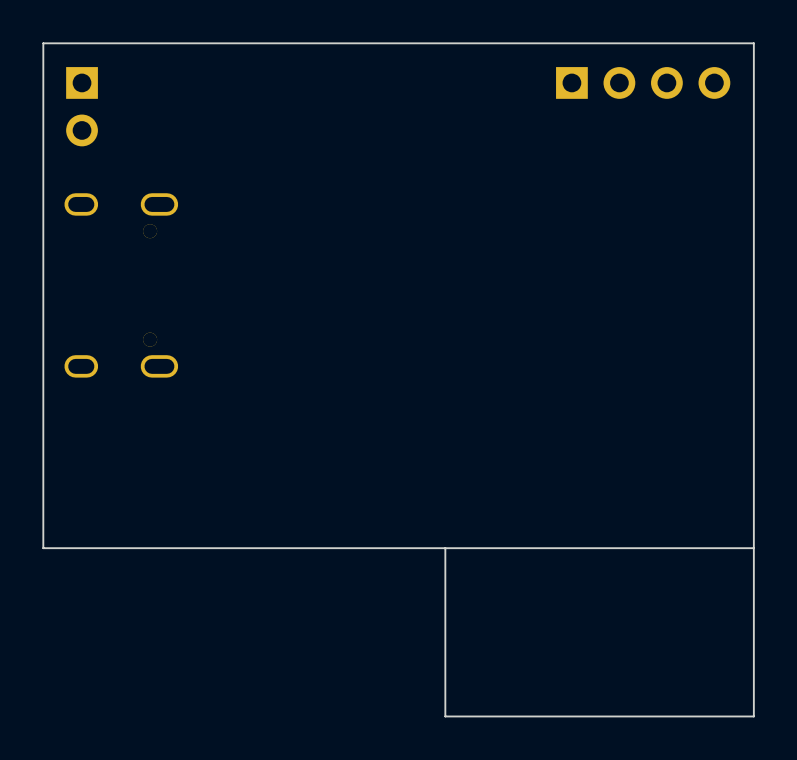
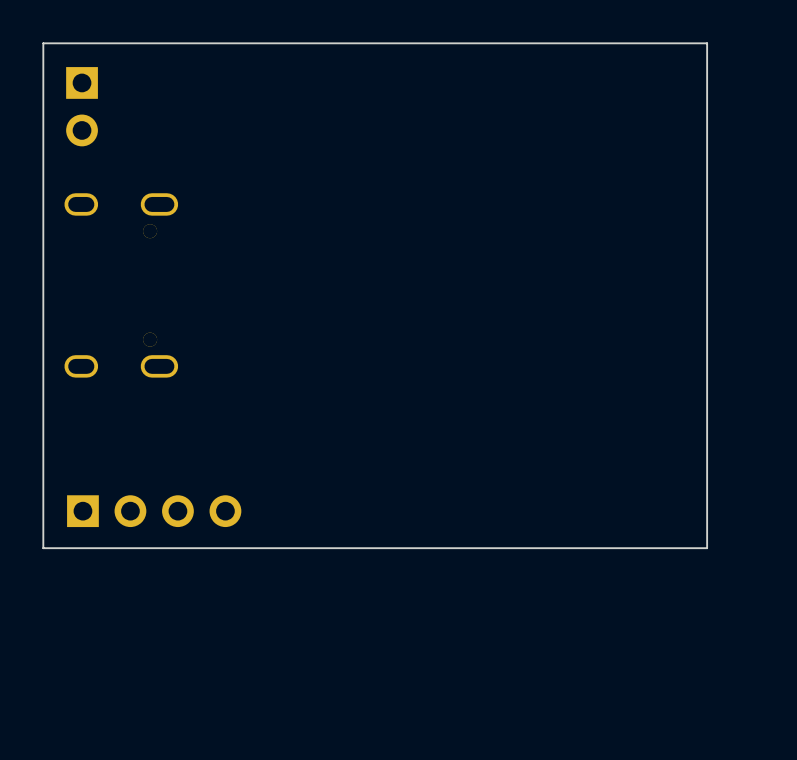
board edge: (707, 43) (753, 43) (753, 716) (445, 716) (445, 548) -> (707, 43) (707, 548)
part: (643, 82) -> none
part: none -> (154, 511)
board edge: (753, 548) (707, 548) -> none

